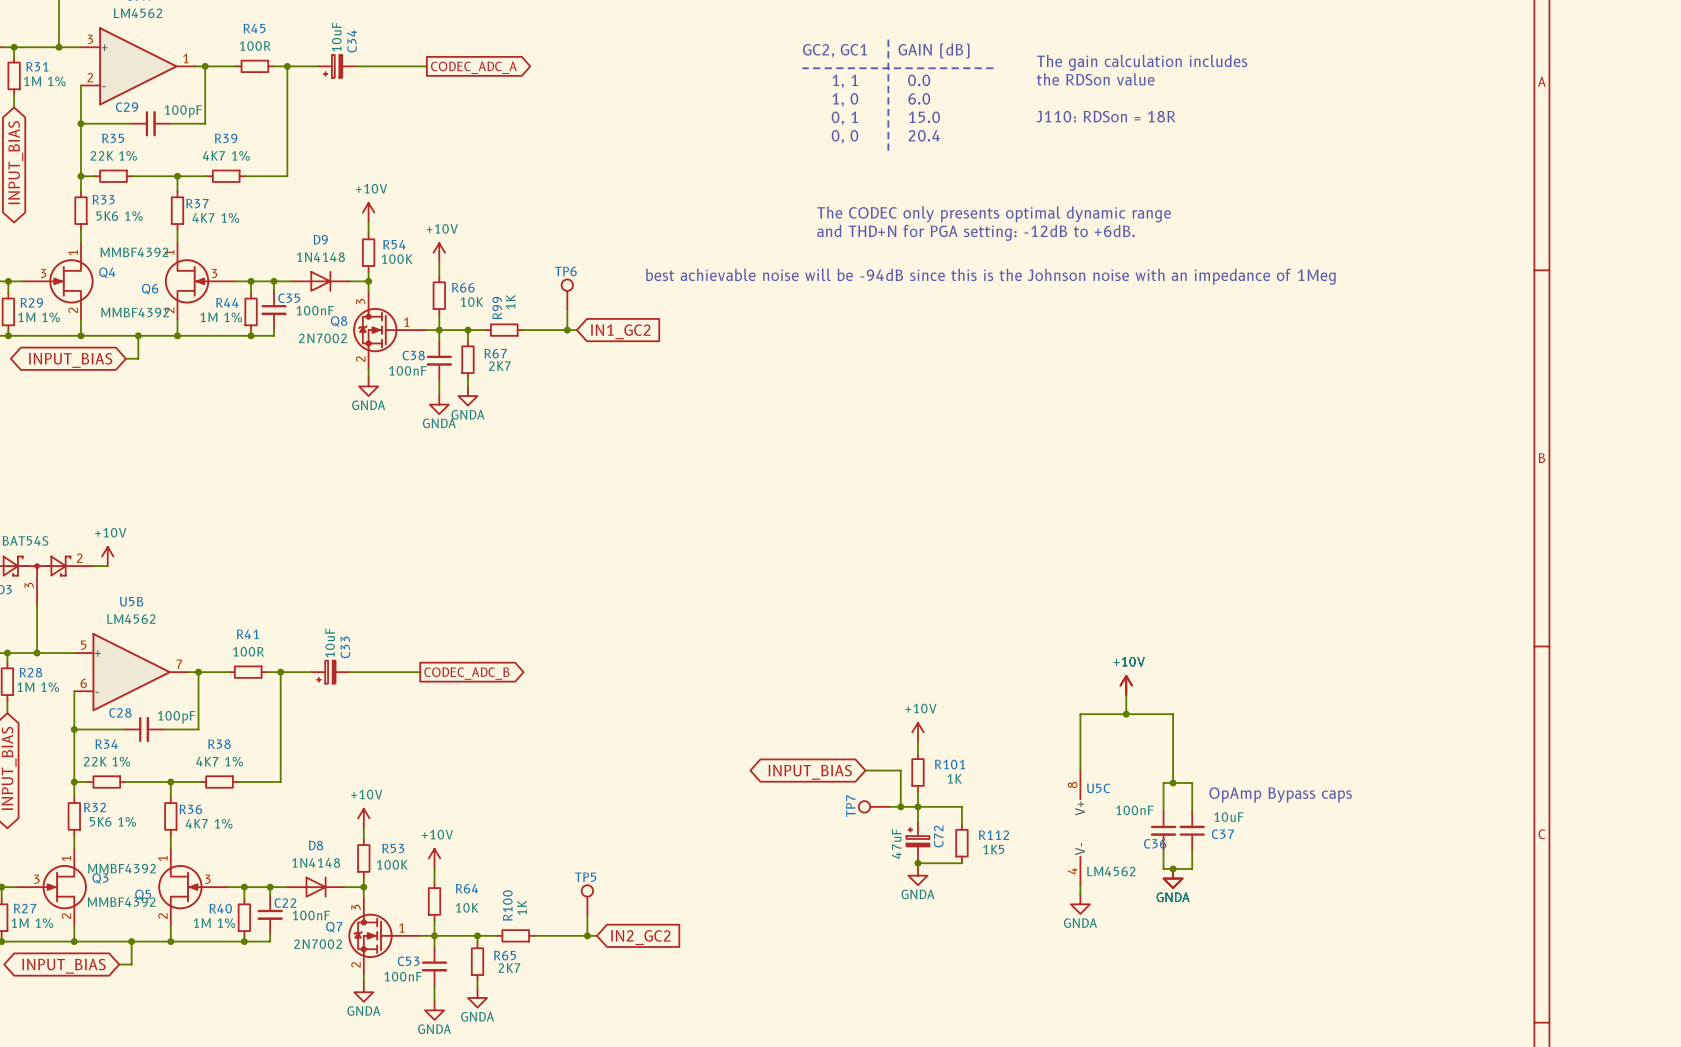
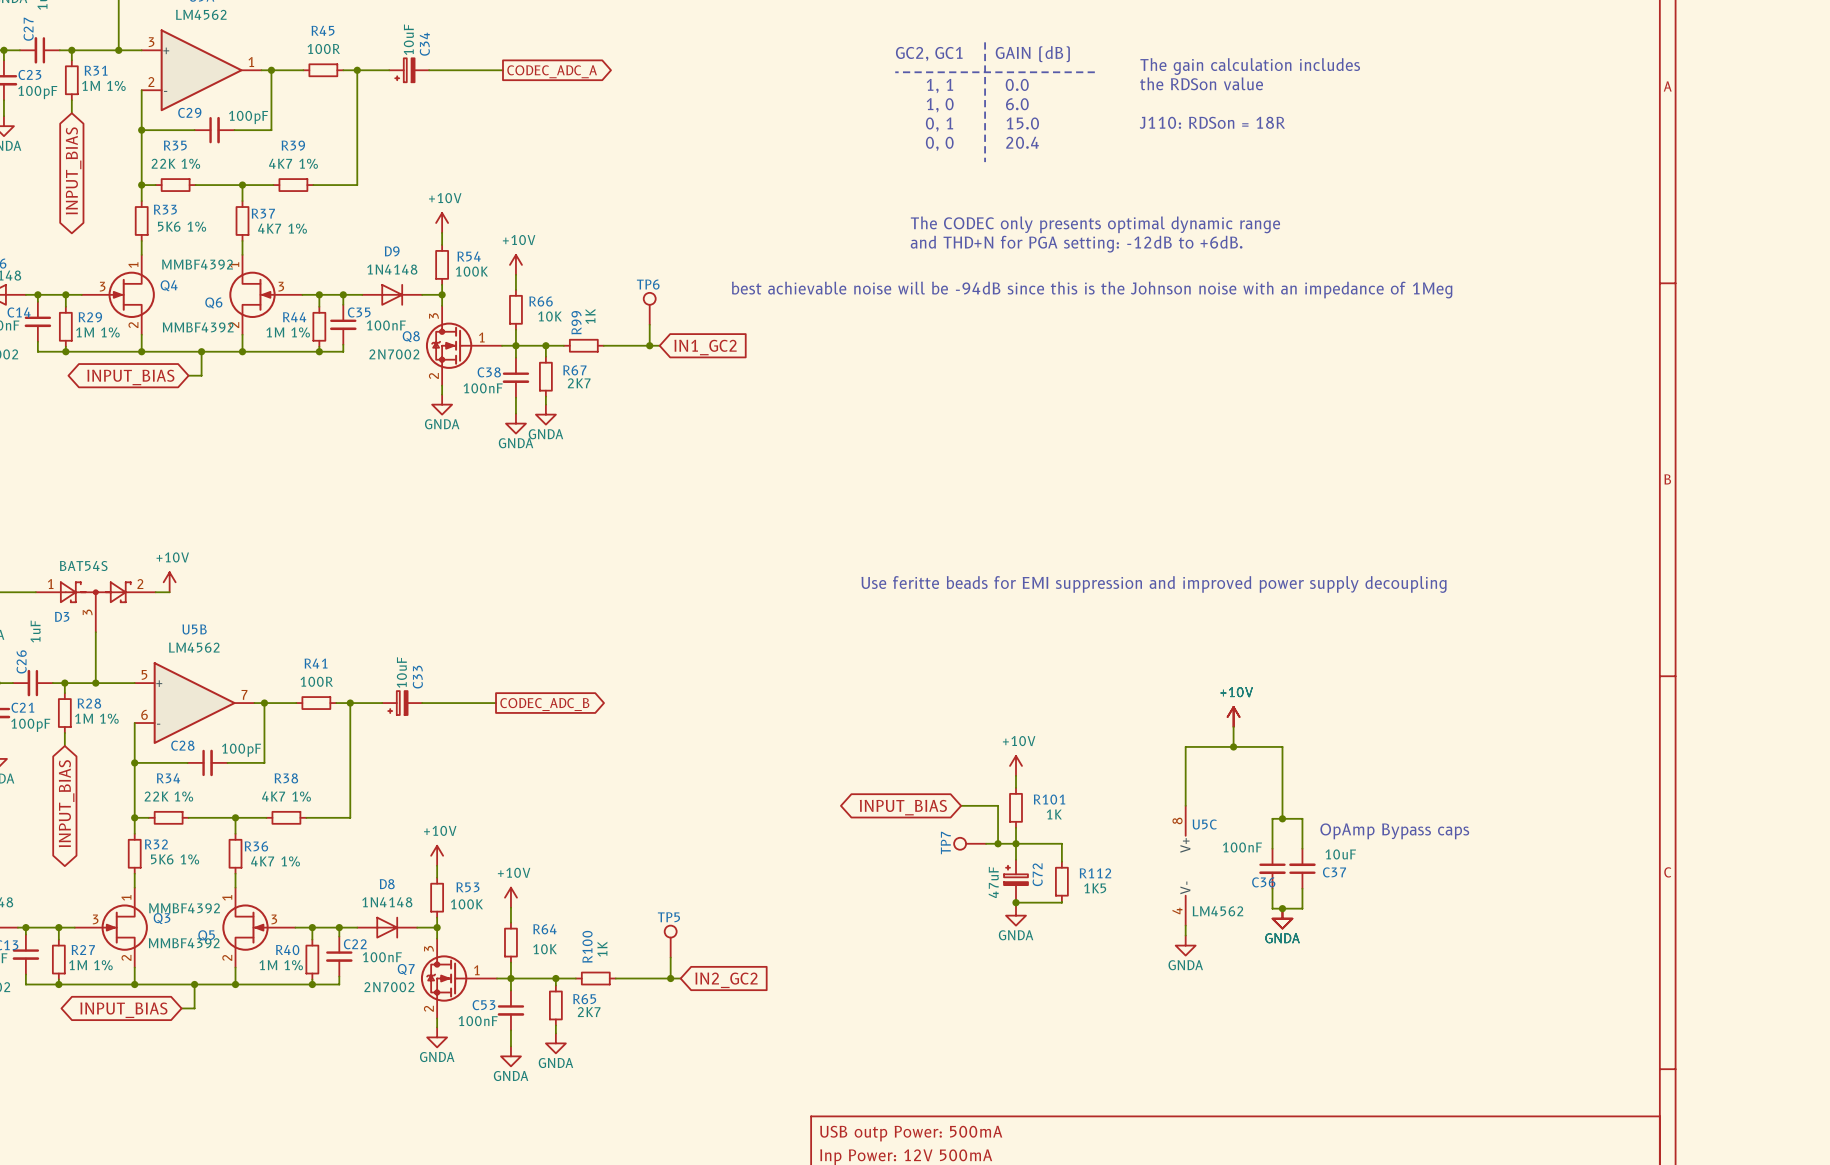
text: none -> Use feritte beads for EMI suppression and improved power supply decoupling (1154, 584)

